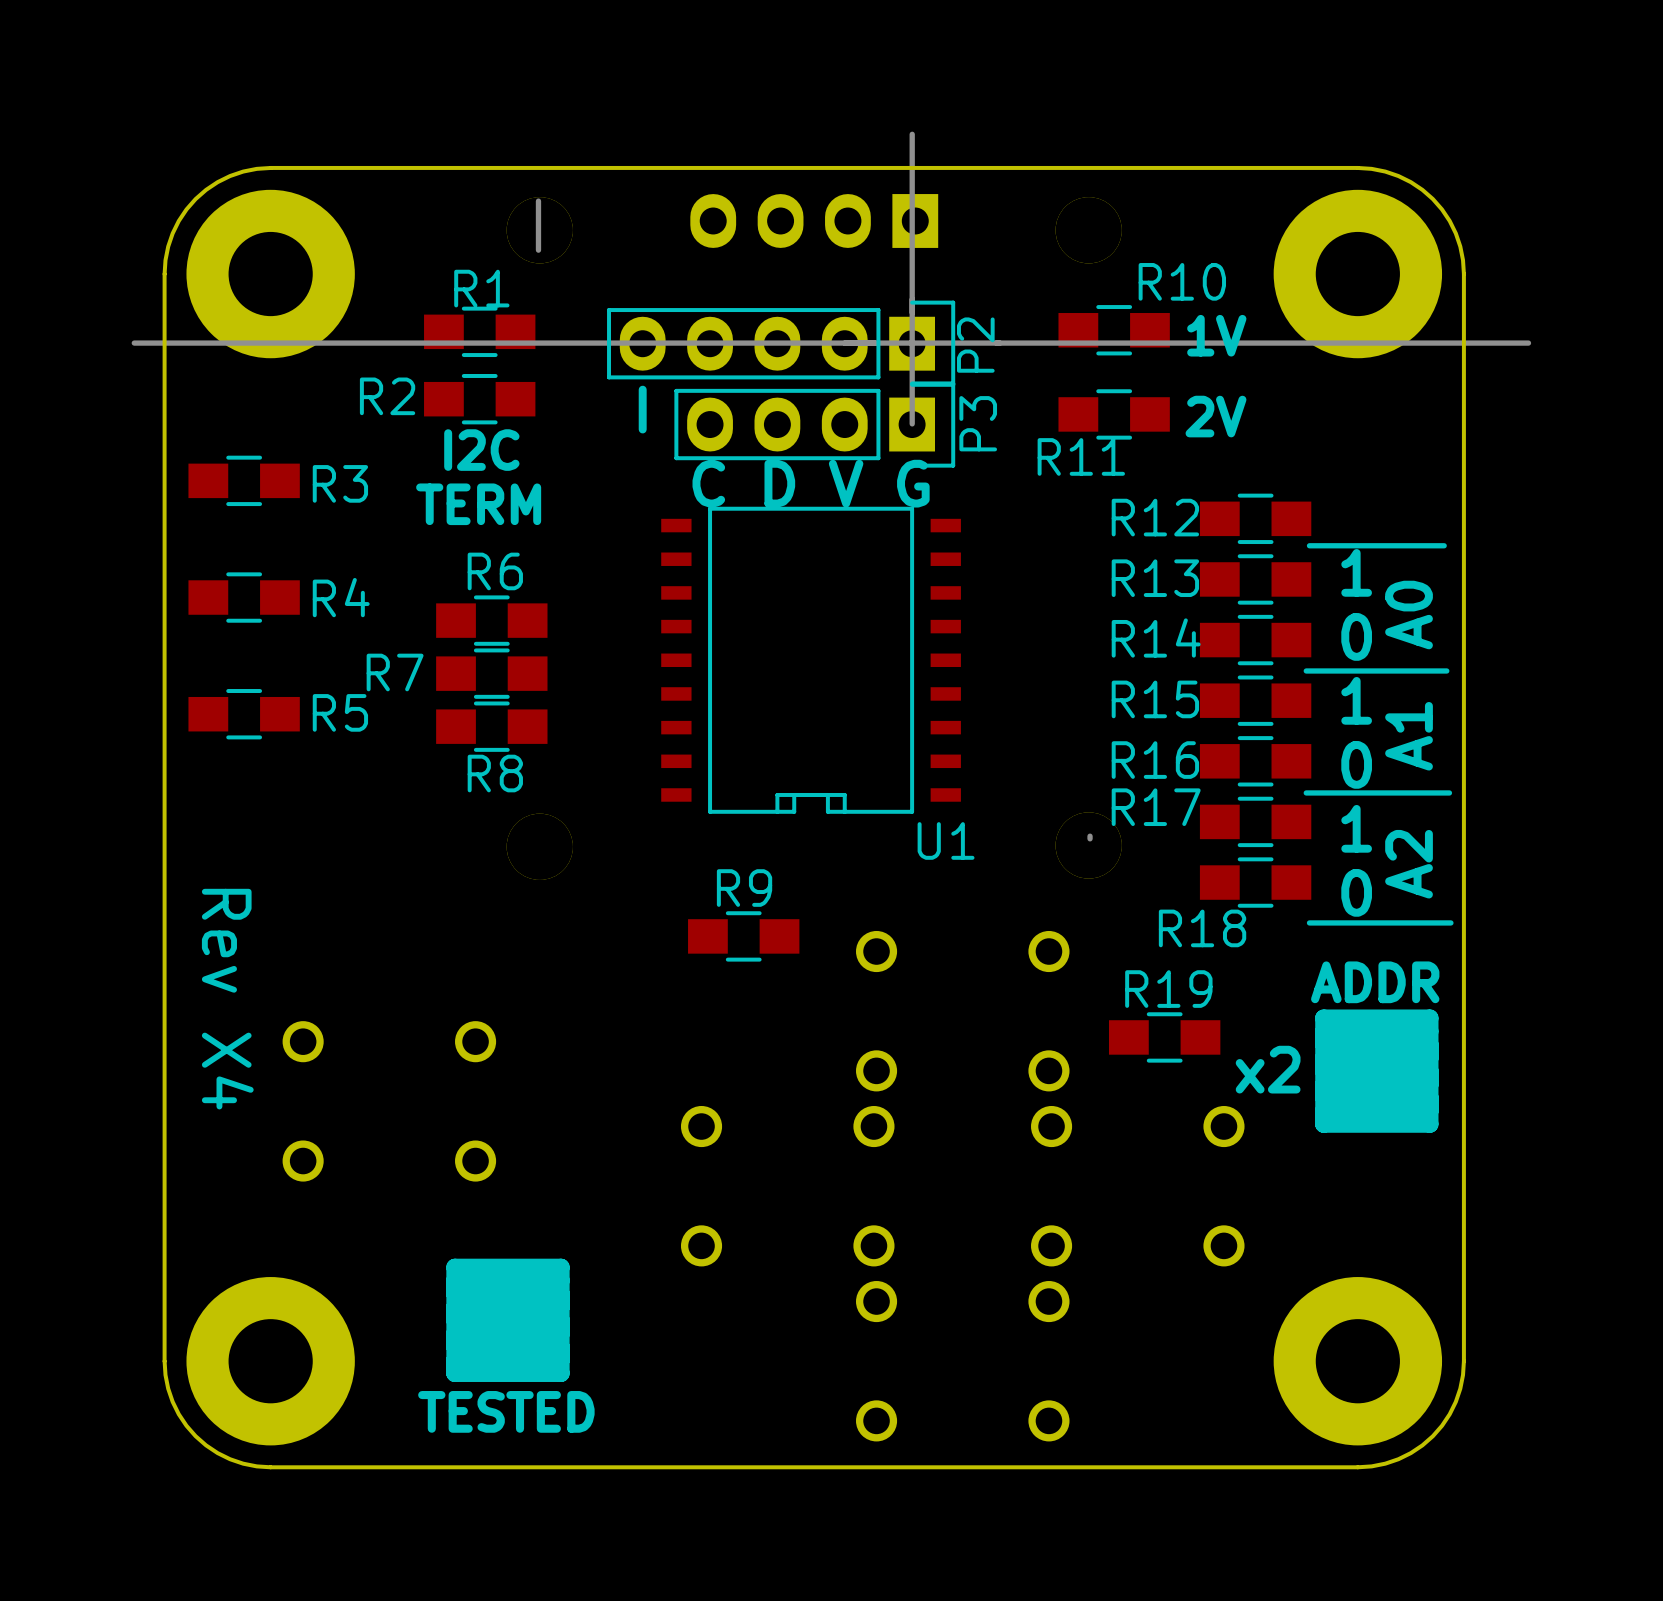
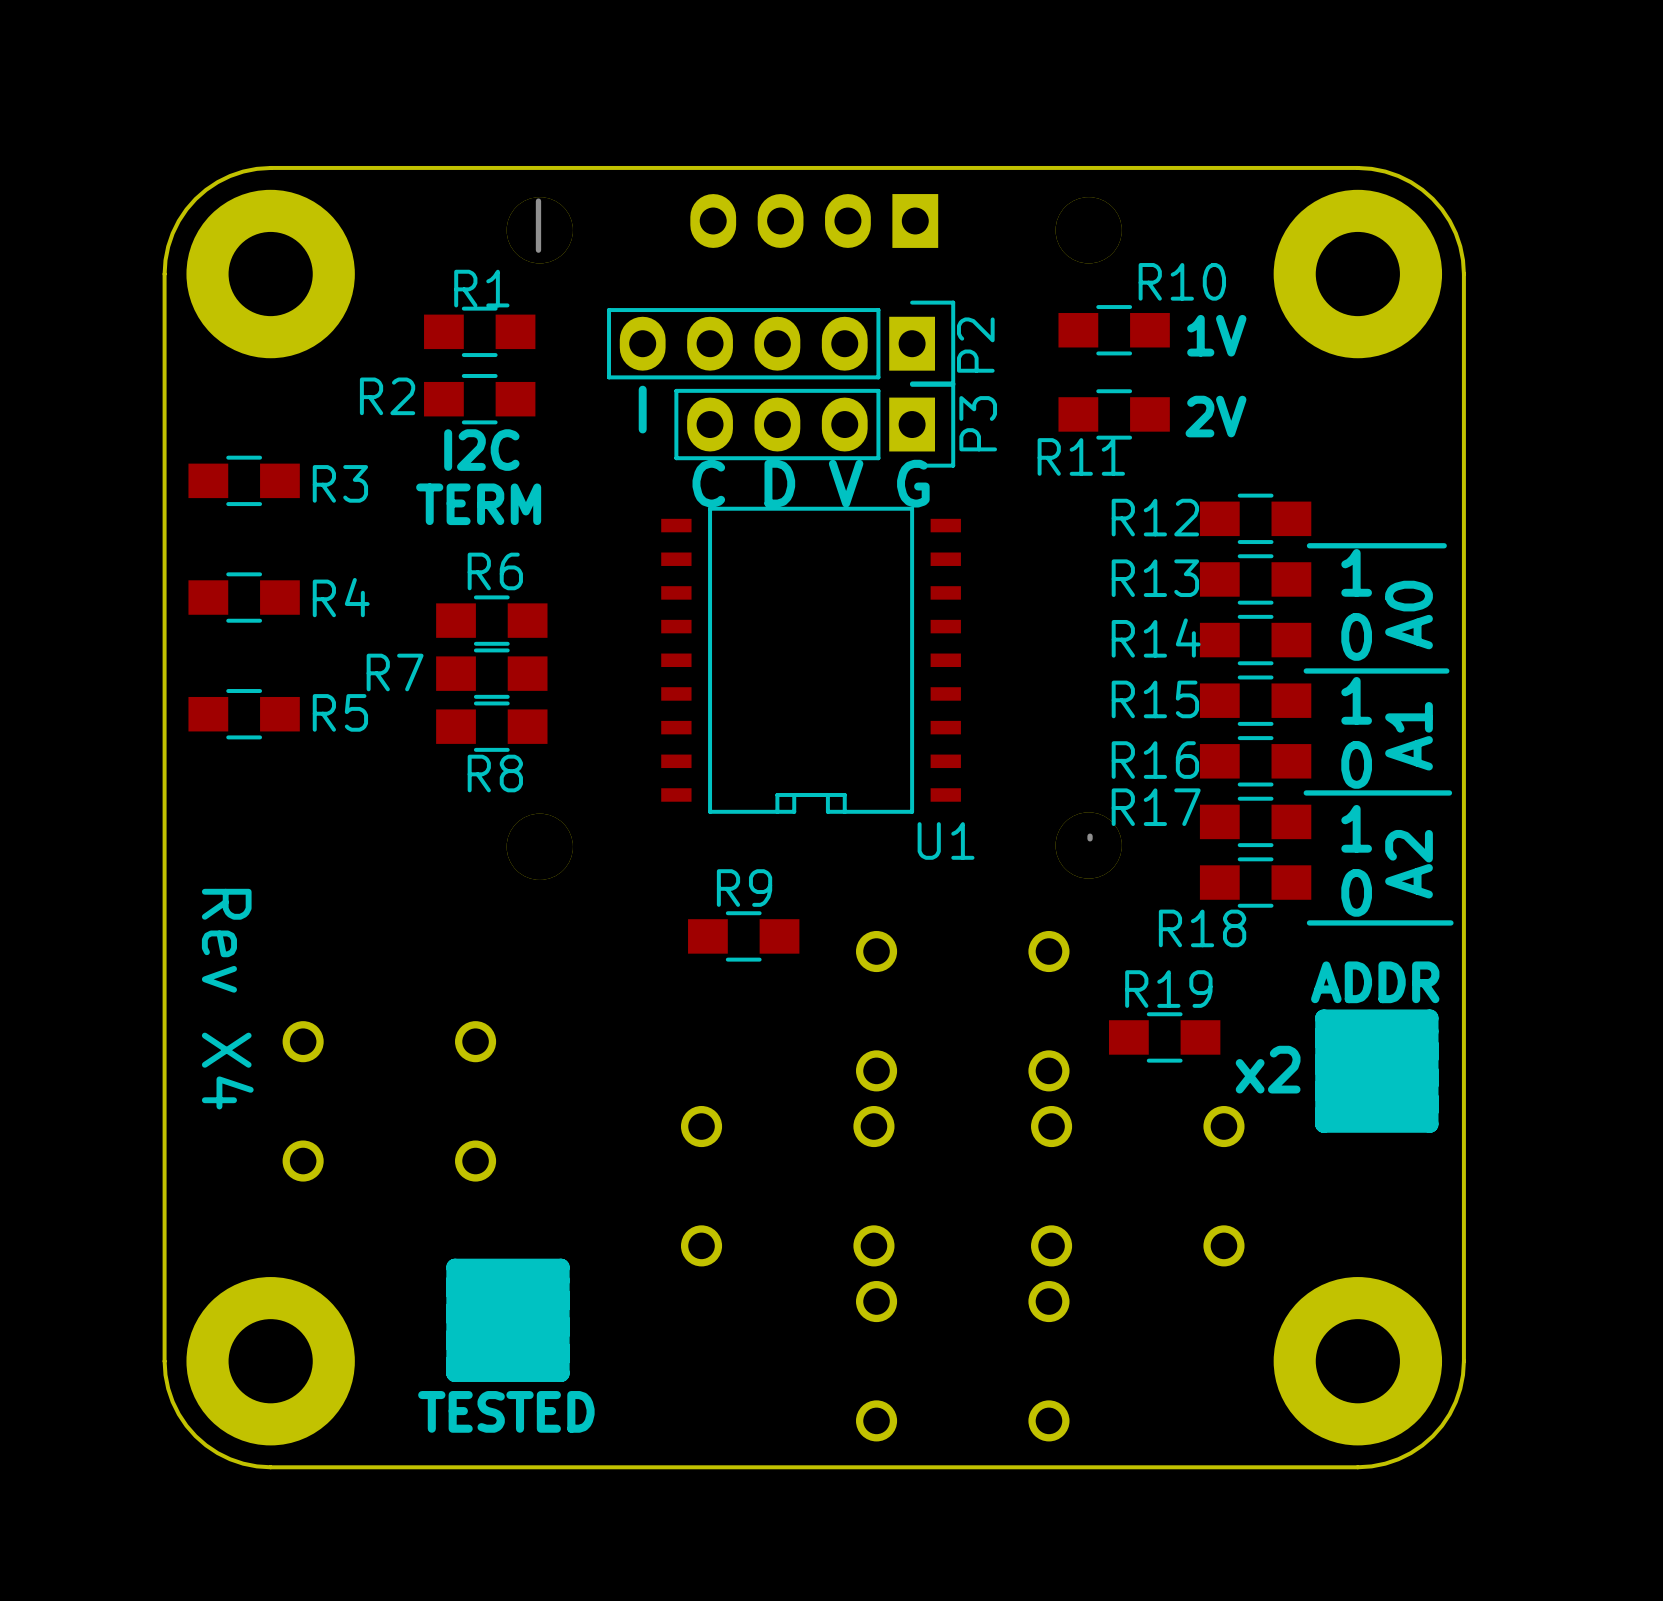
line: (912, 134) (912, 423) -> none
line: (134, 343) (1528, 343) -> none

